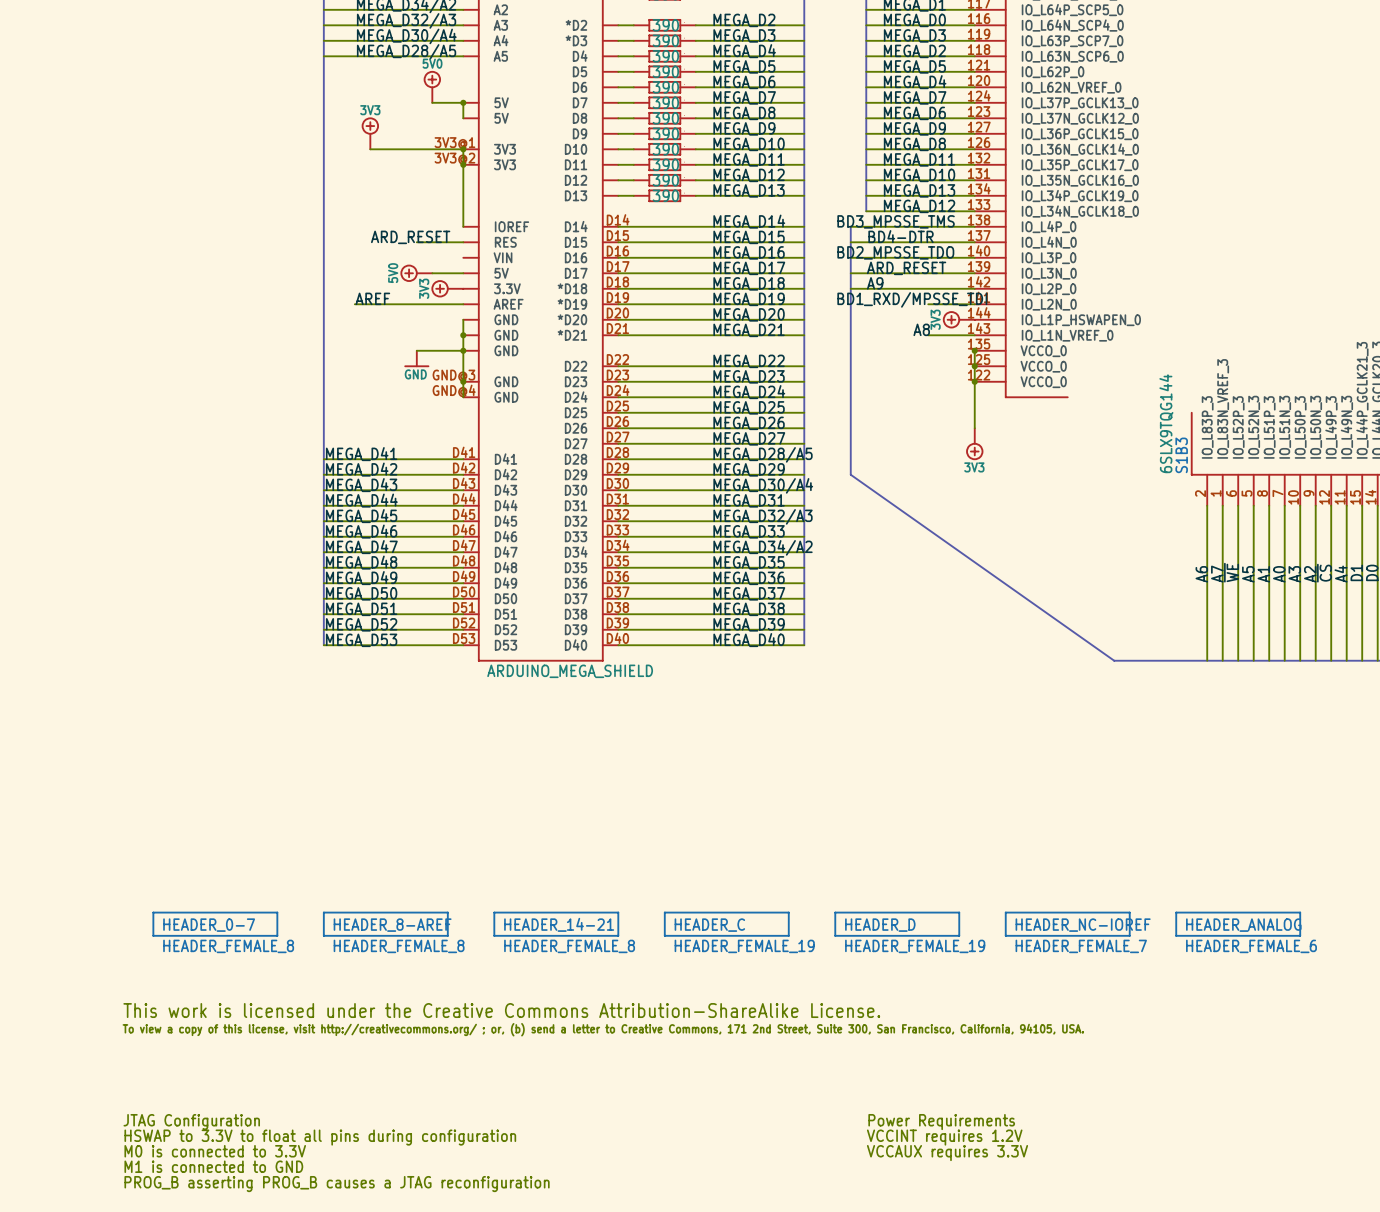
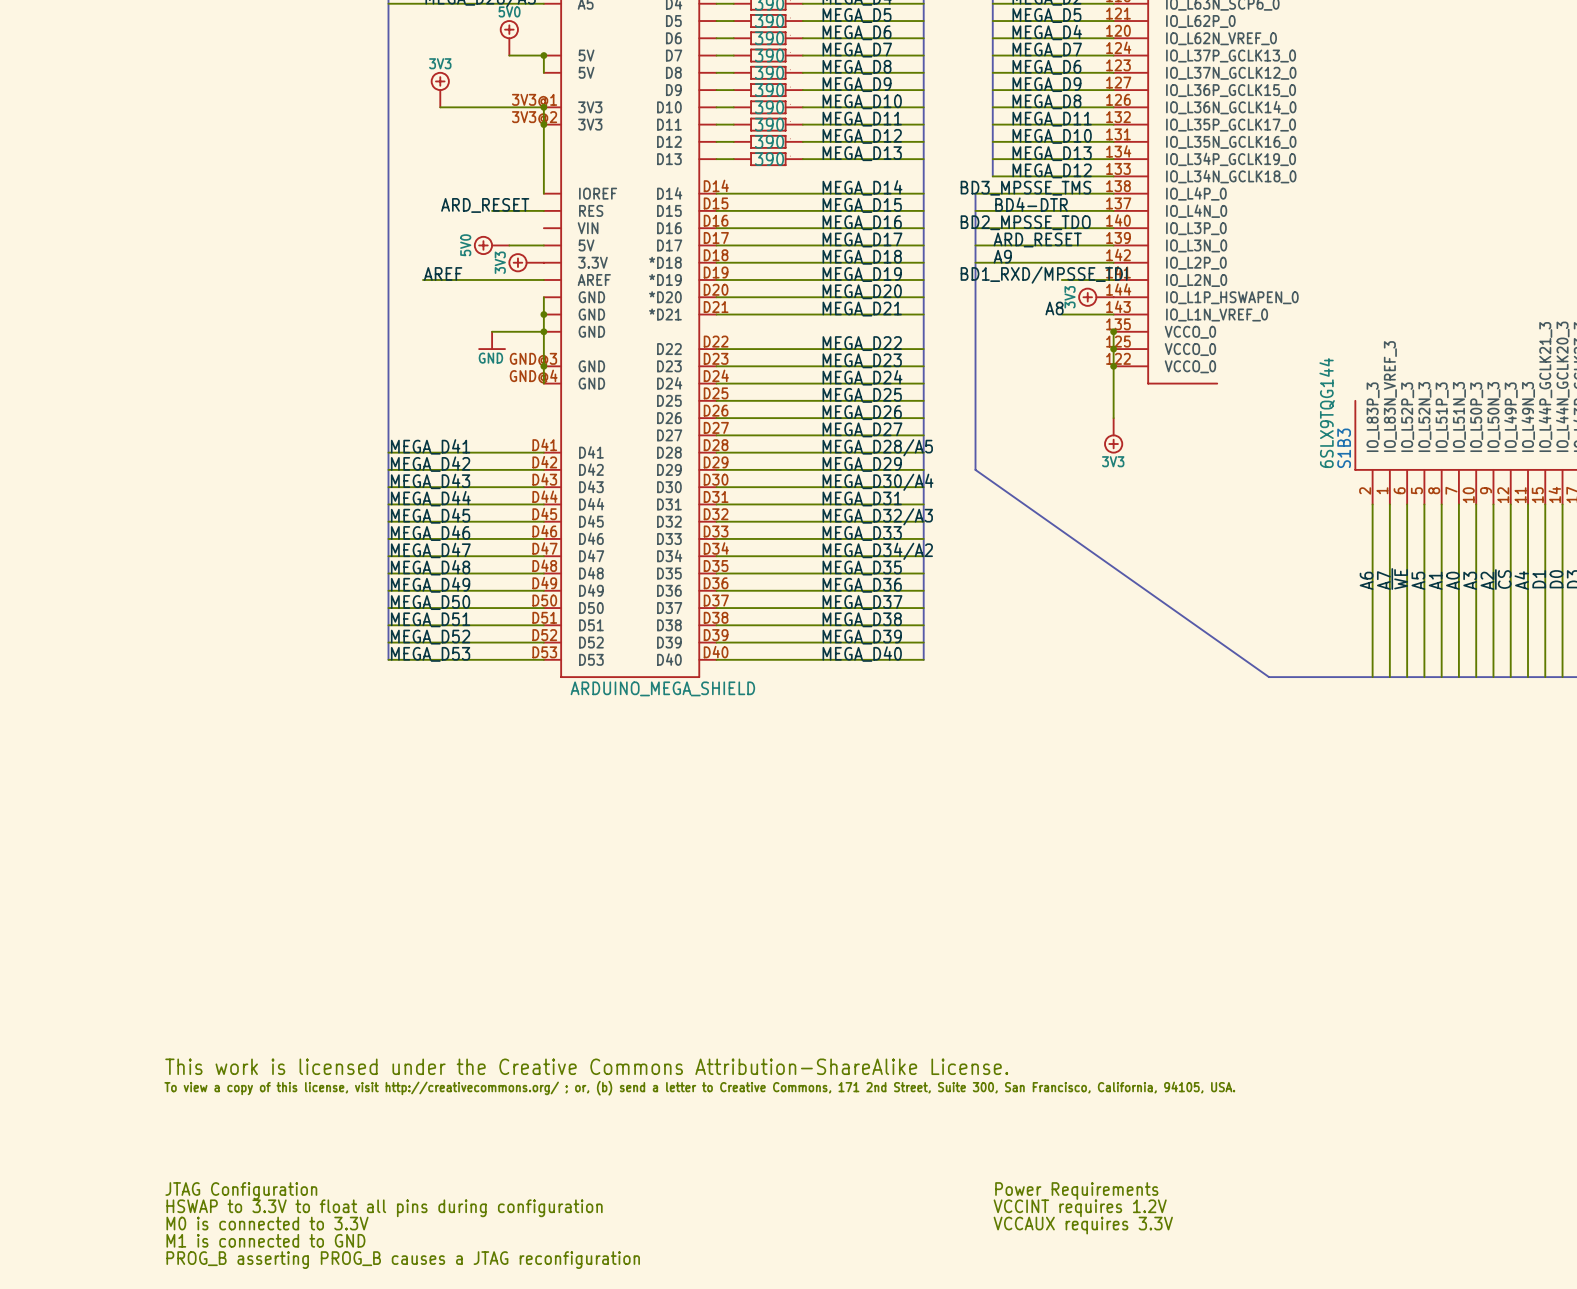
HEADER_0-7: HEADER_FEMALE_8 (215, 924) -> none
HEADER_8-AREF: HEADER_FEMALE_8 (385, 924) -> none
HEADER_14-21: HEADER_FEMALE_8 (556, 924) -> none
HEADER_C: HEADER_FEMALE_19 (726, 924) -> none
HEADER_D: HEADER_FEMALE_19 (897, 924) -> none
HEADER_NC-IOREF: HEADER_FEMALE_7 (1067, 924) -> none
HEADER_ANALOG: HEADER_FEMALE_6 (1238, 924) -> none

